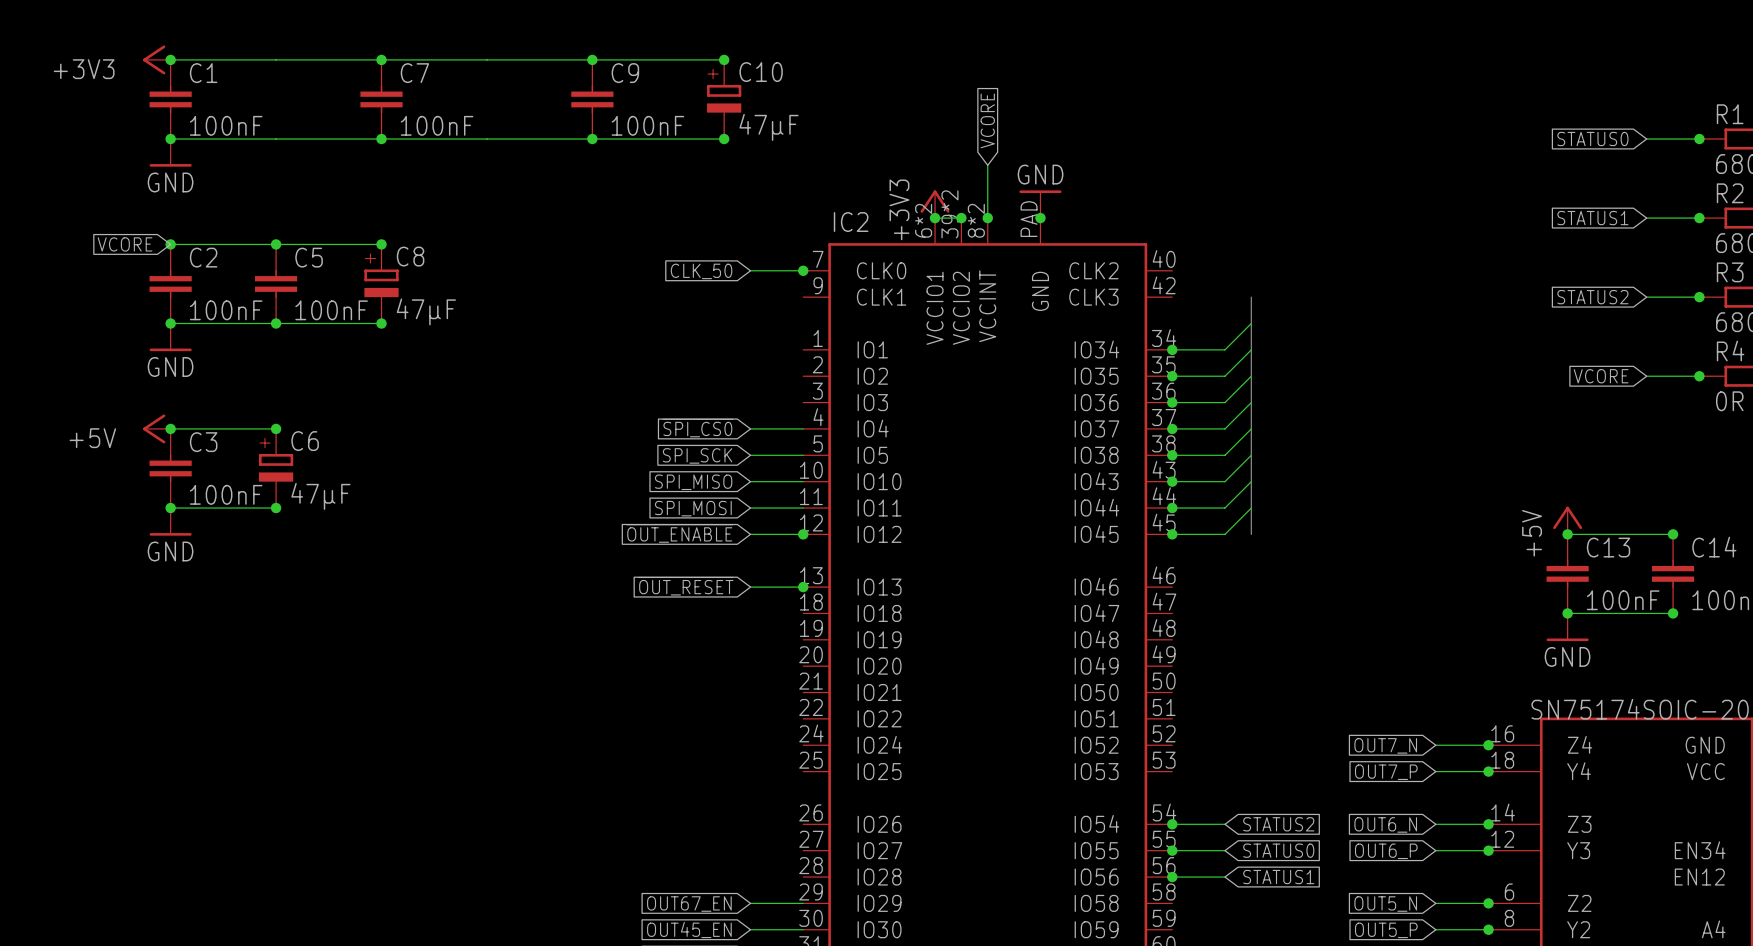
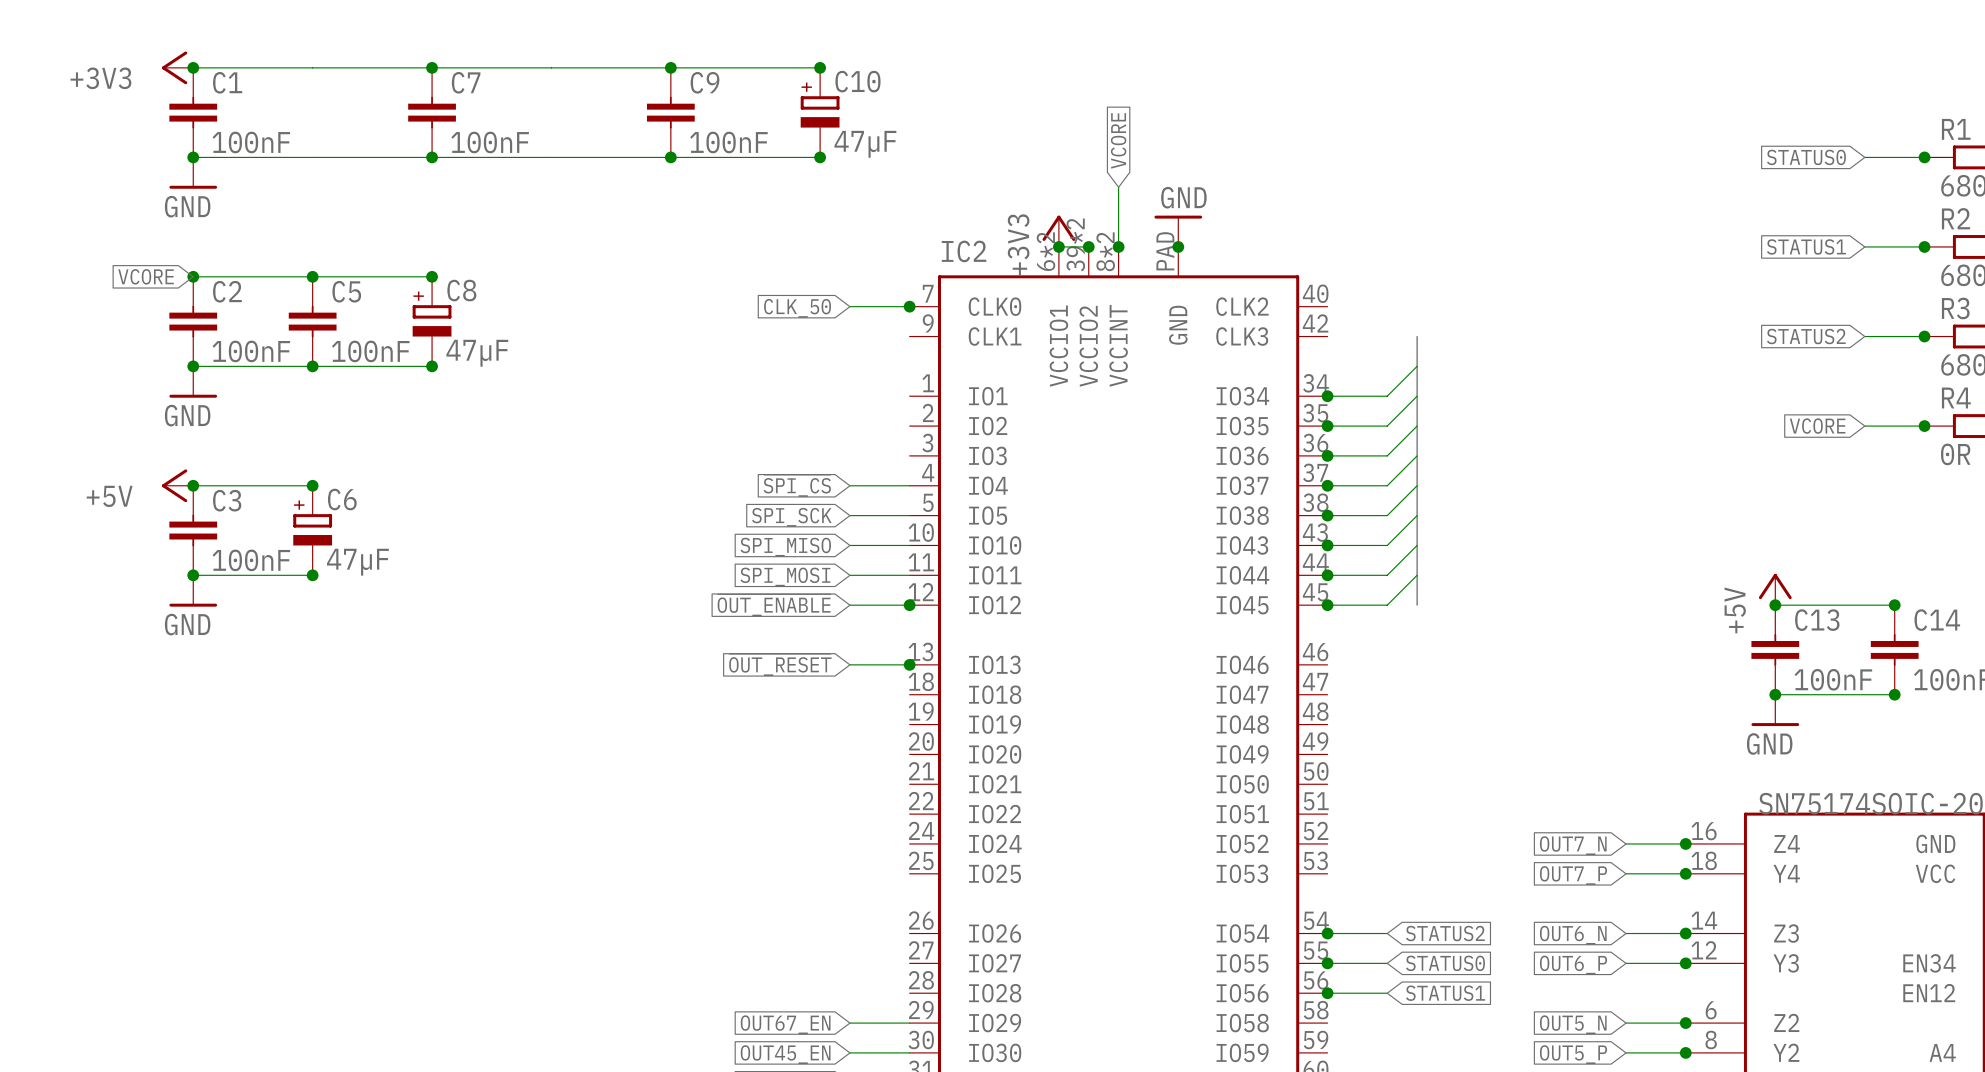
global label: ~{SPI_CS0} (697, 428) -> ~{SPI_CS} (797, 485)

